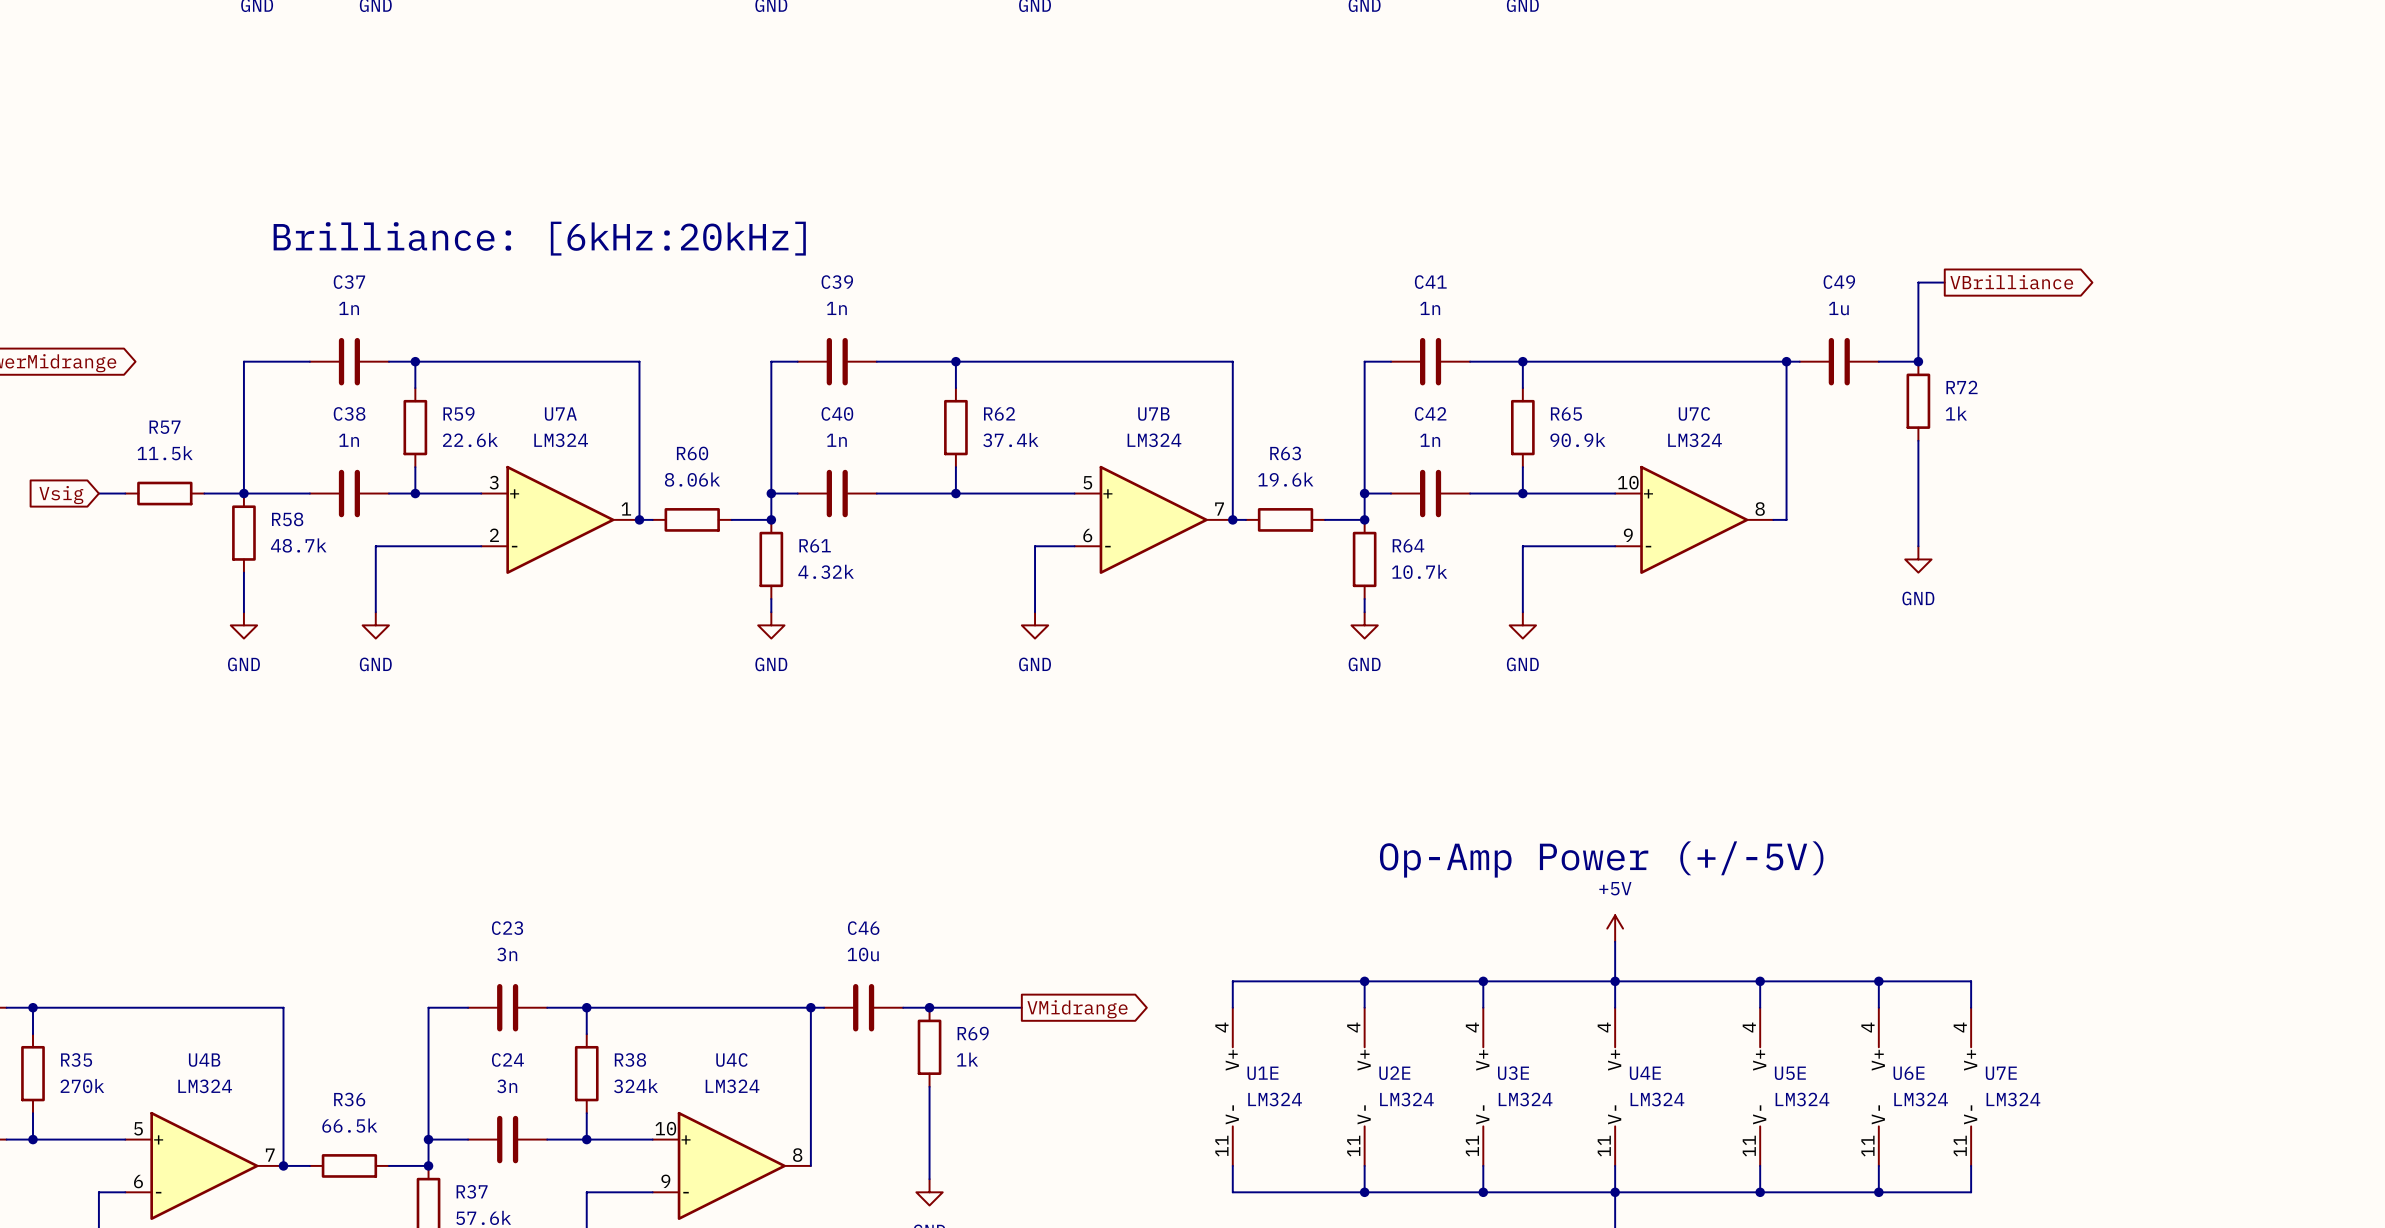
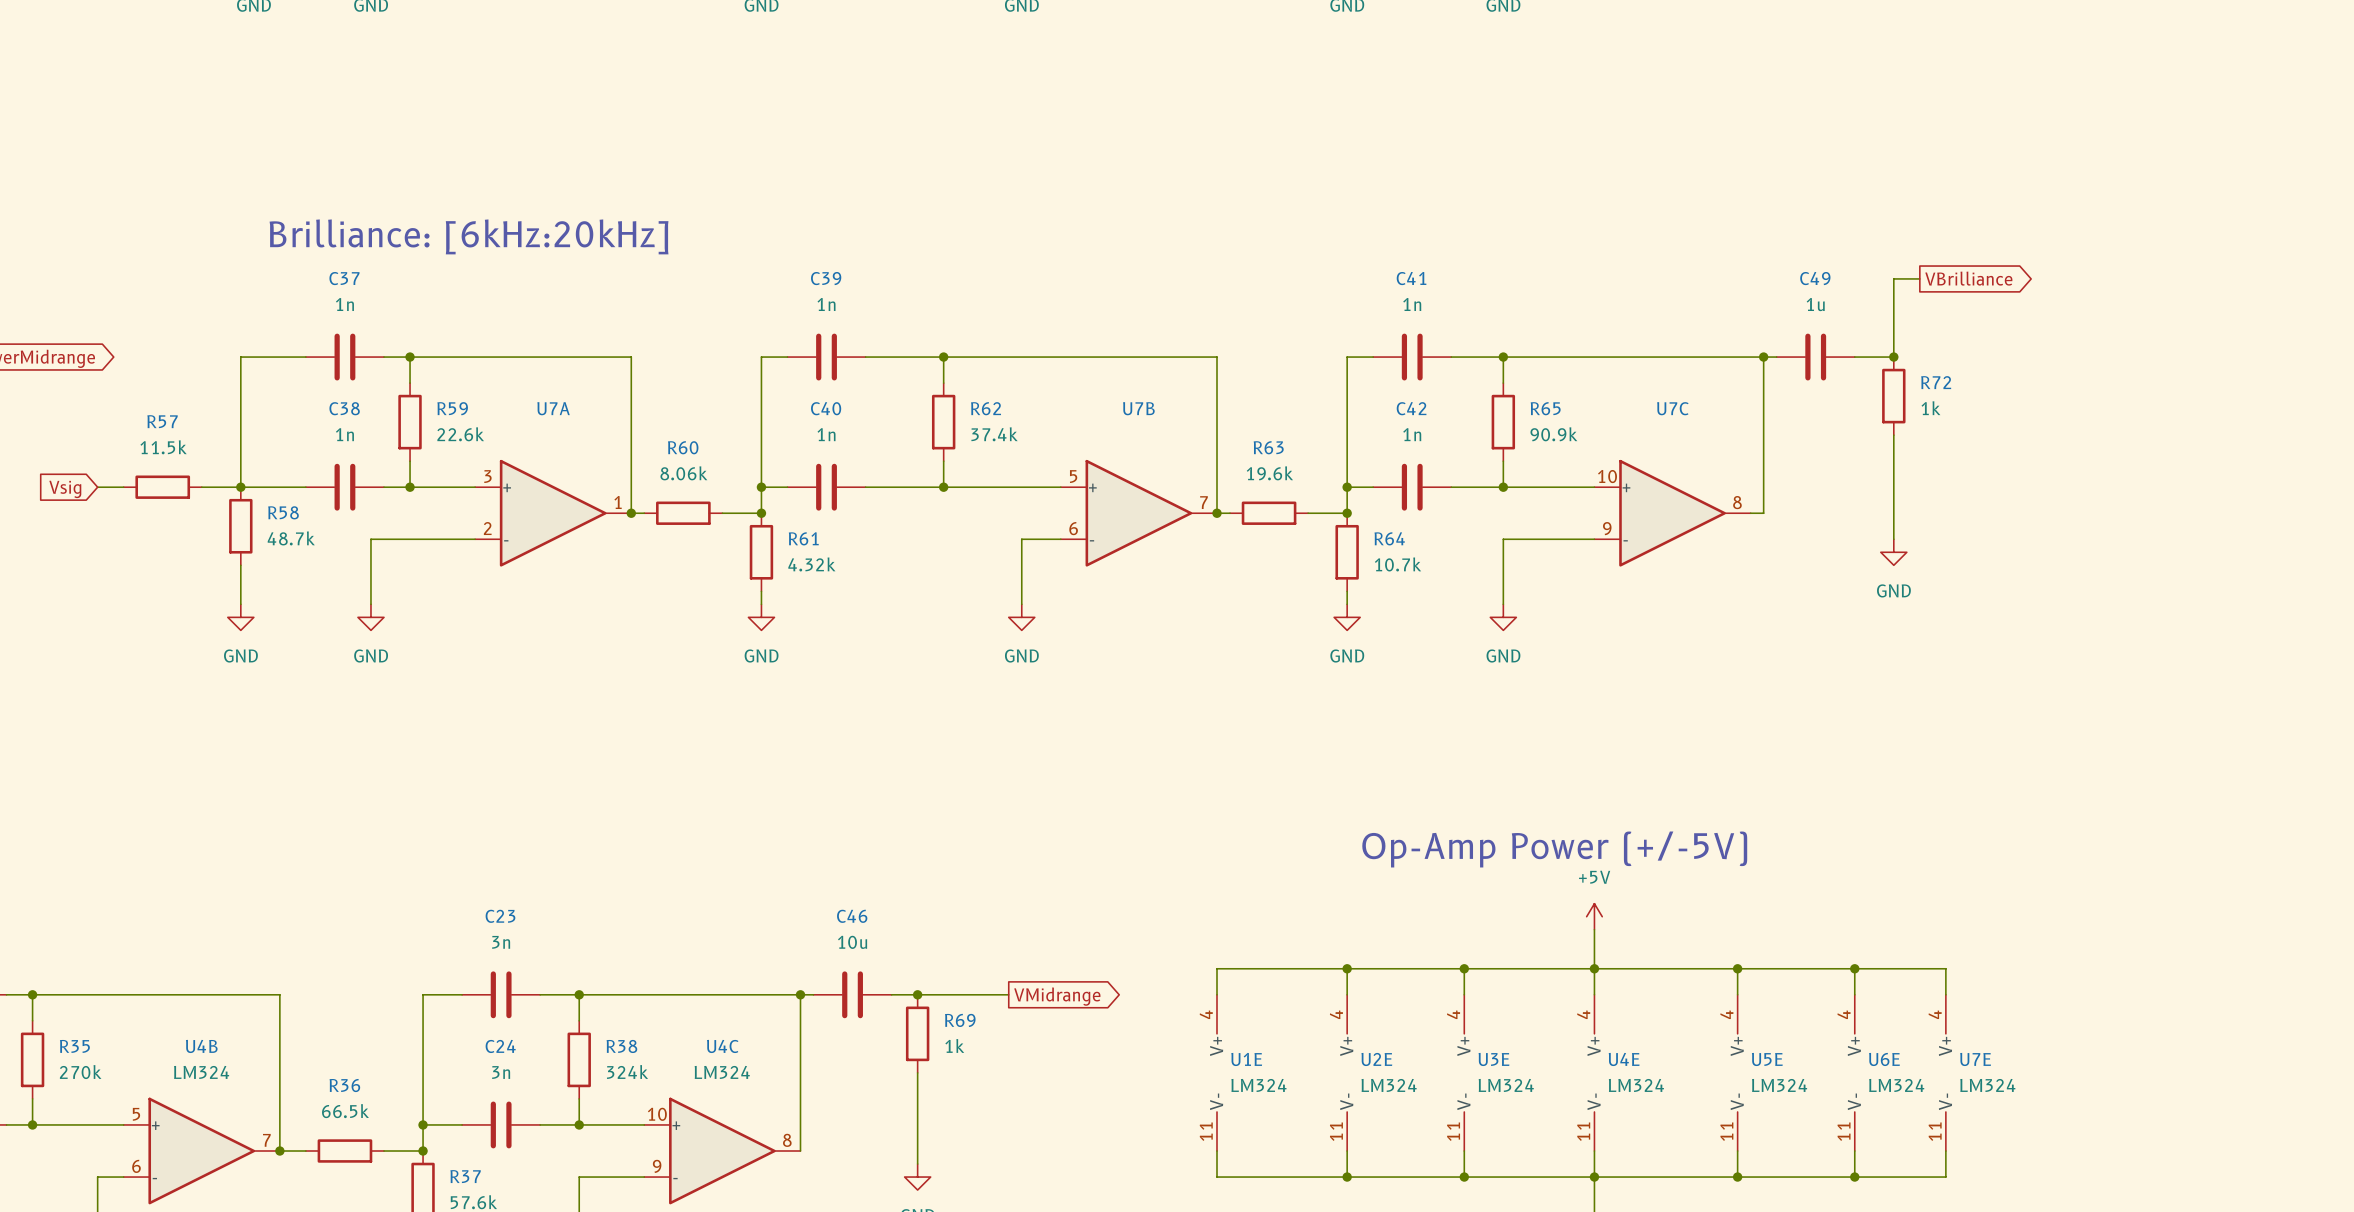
U7A value: LM324 (561, 440) -> none
U7B value: LM324 (1154, 440) -> none
U7C value: LM324 (1695, 440) -> none

